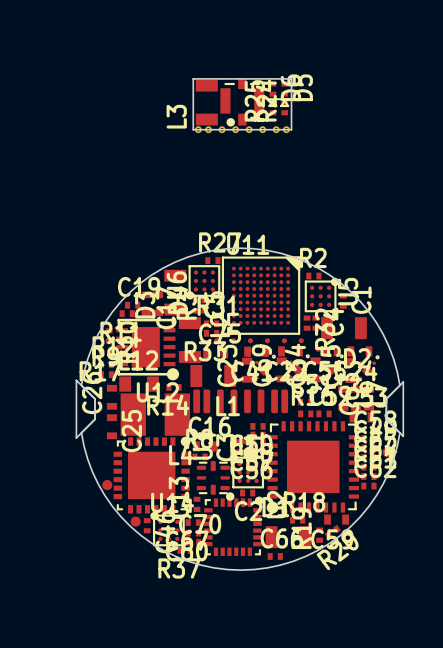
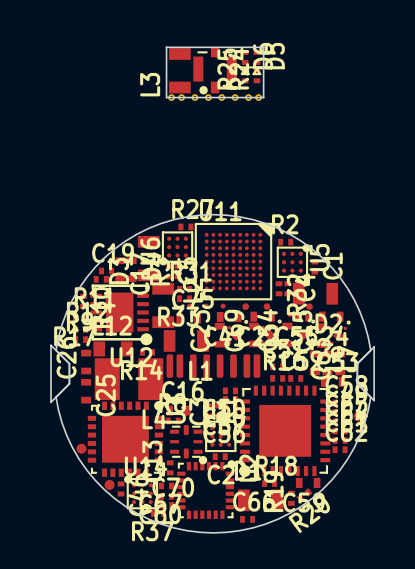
part: (267, 340) -> none
part: (284, 340) -> none
part: (301, 340) -> none
part: none -> (245, 306)
part: none -> (266, 306)
part: none -> (309, 306)

